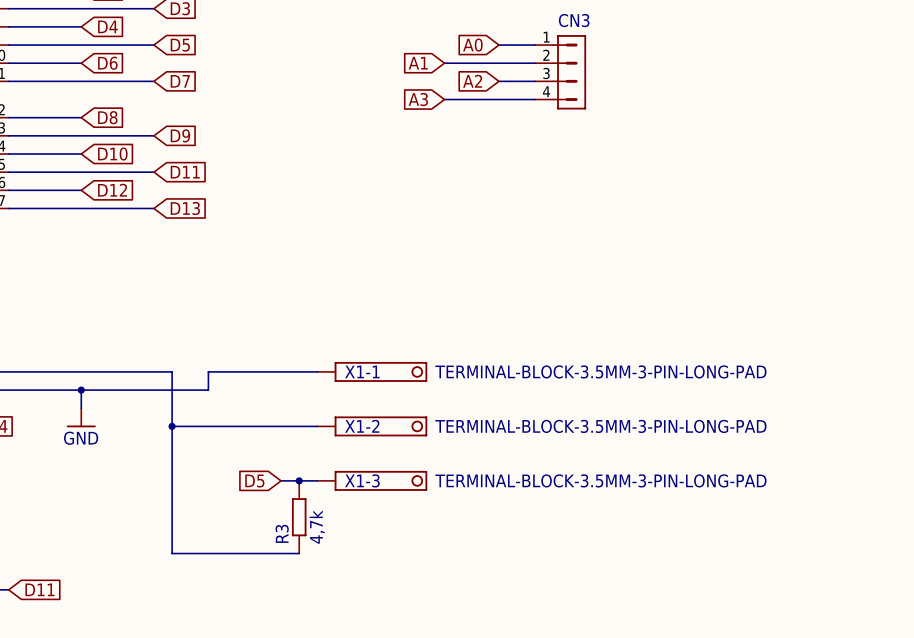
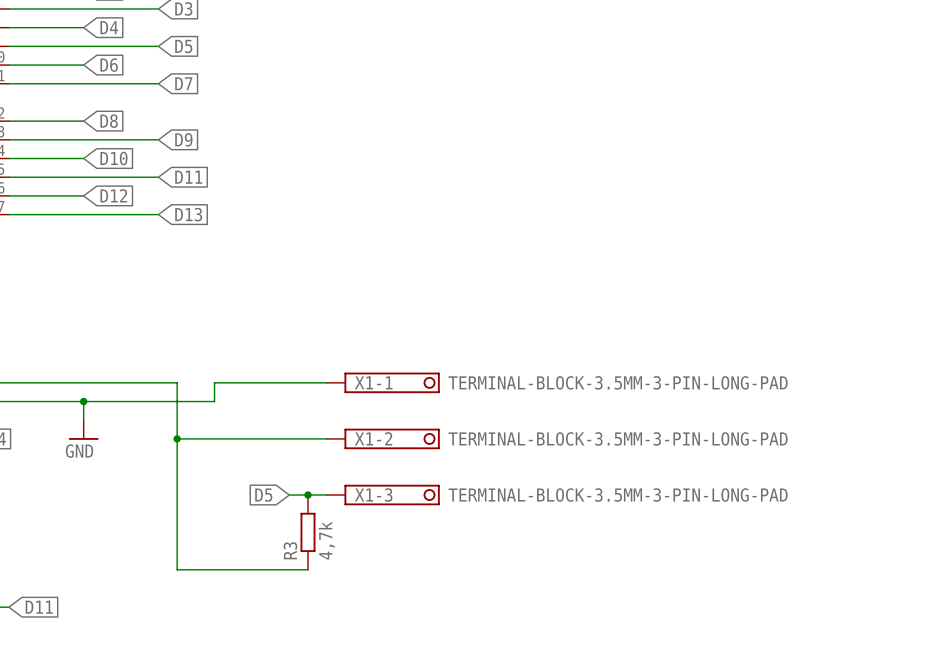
global label: A0 (472, 45) -> none
wire: (498, 45) (535, 45) -> none
global label: A1 (418, 63) -> none
wire: (444, 63) (535, 63) -> none
CN3: (560, 72) -> none
global label: A2 (472, 81) -> none
wire: (498, 81) (535, 81) -> none
global label: A3 (418, 99) -> none
wire: (444, 99) (535, 99) -> none

